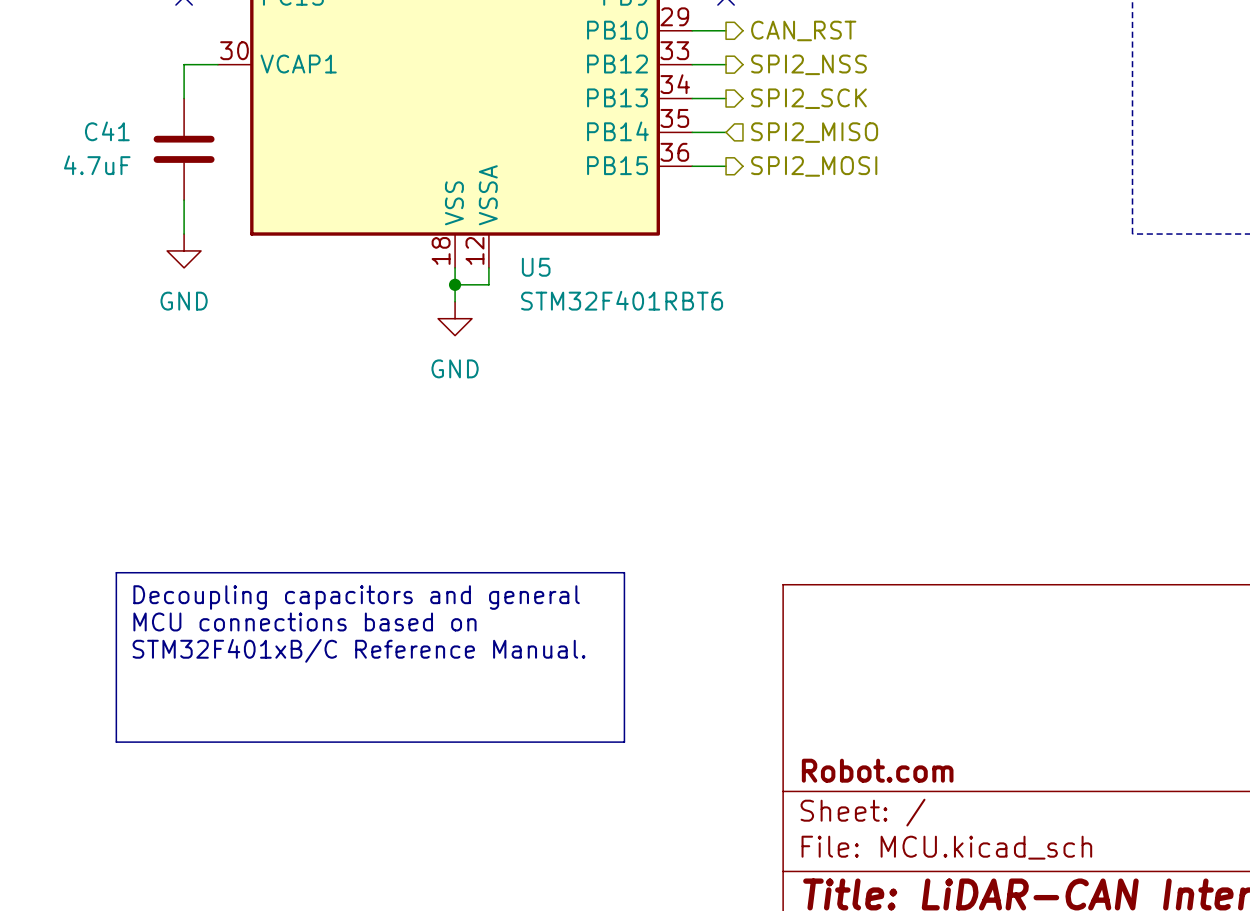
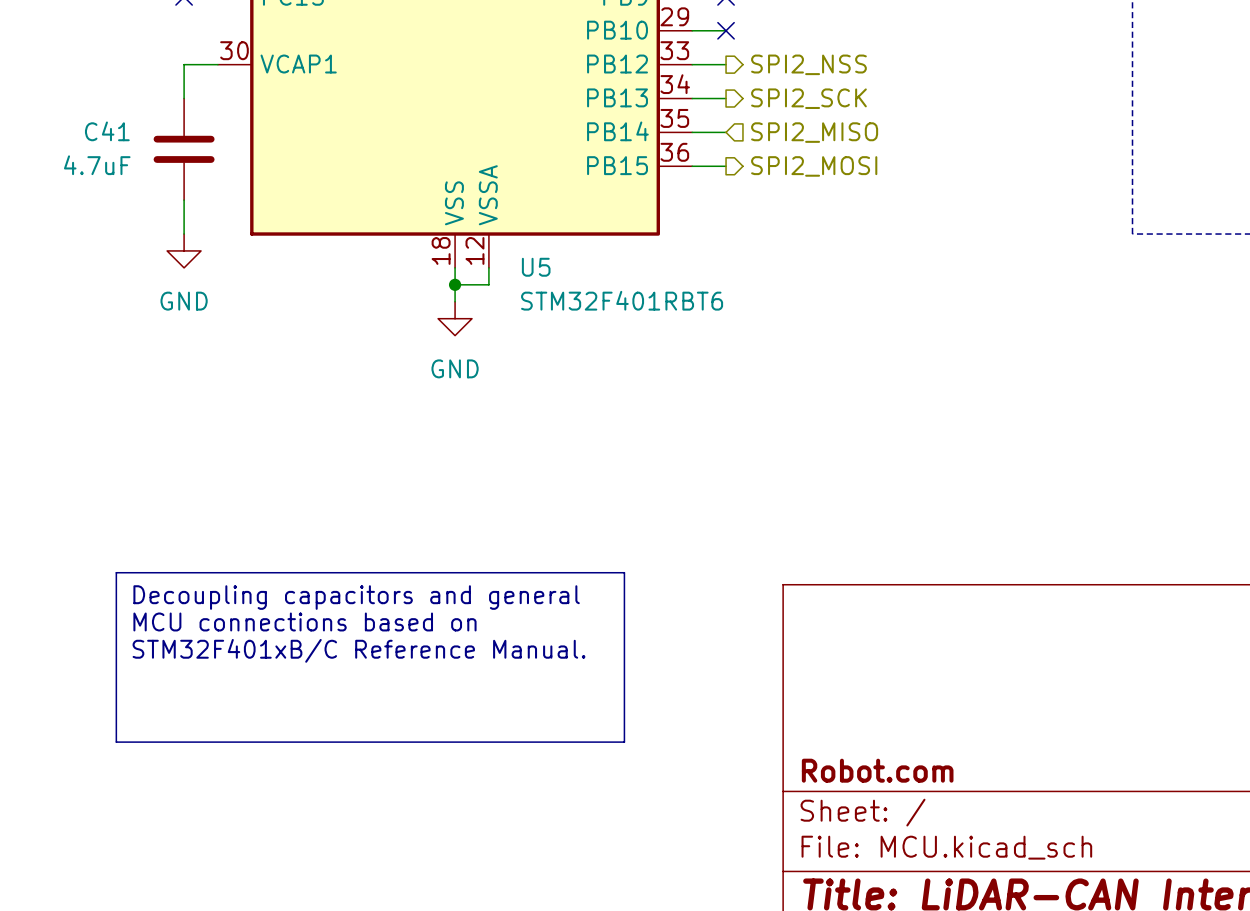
no-connect mark: none -> (726, 30)
hierarchical label: CAN_RST (803, 30) -> none

